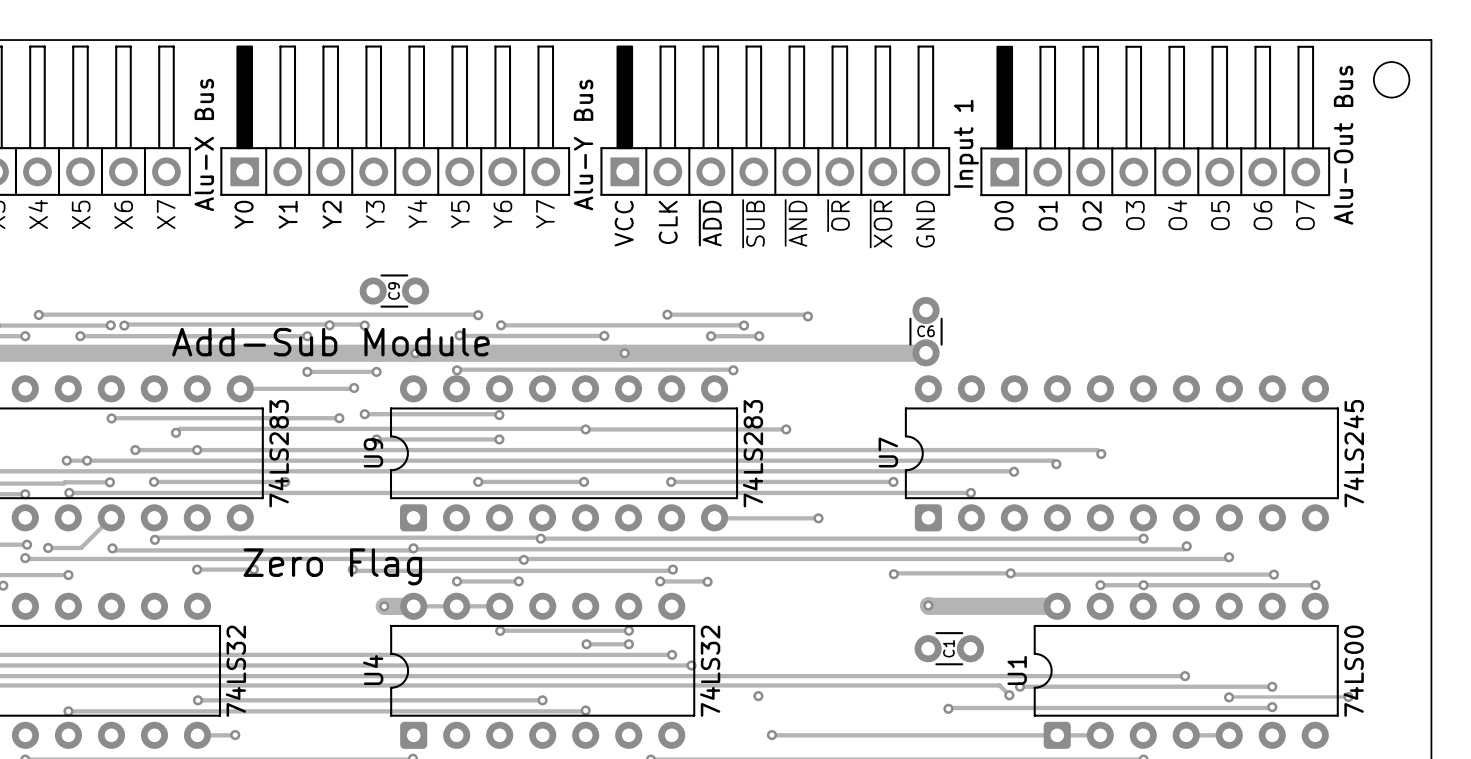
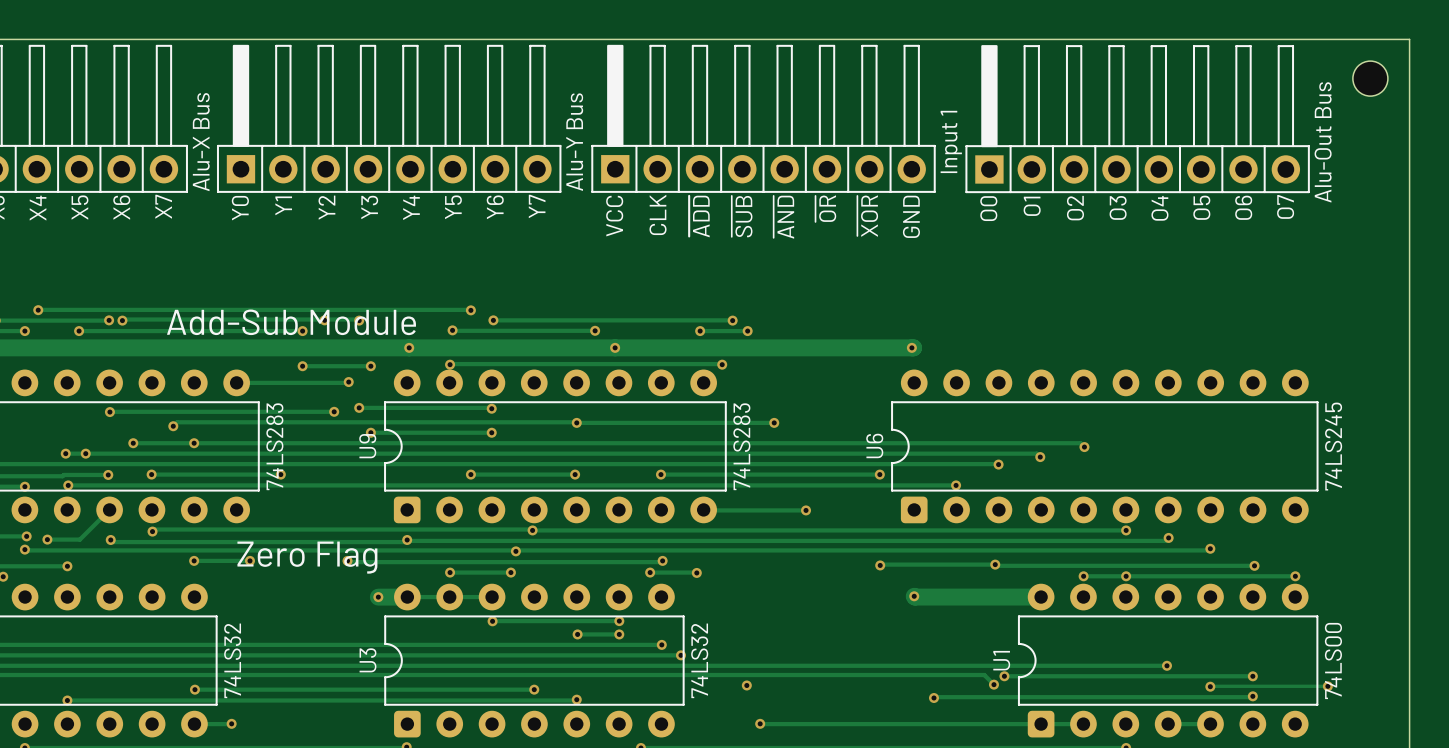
C9: (394, 291) -> none
track: (667, 314) (806, 314) (807, 316) -> none
via: (667, 314) -> none
via: (807, 316) -> none
C6: (926, 331) -> none
text position: Add-Sub Module (330, 342) -> Add-Sub Module (291, 322)
via: none -> (911, 347)
U7 name: U7 (888, 452) -> U6 (874, 445)
C1: (949, 648) -> none
U4 name: U4 (373, 670) -> U3 (368, 660)

